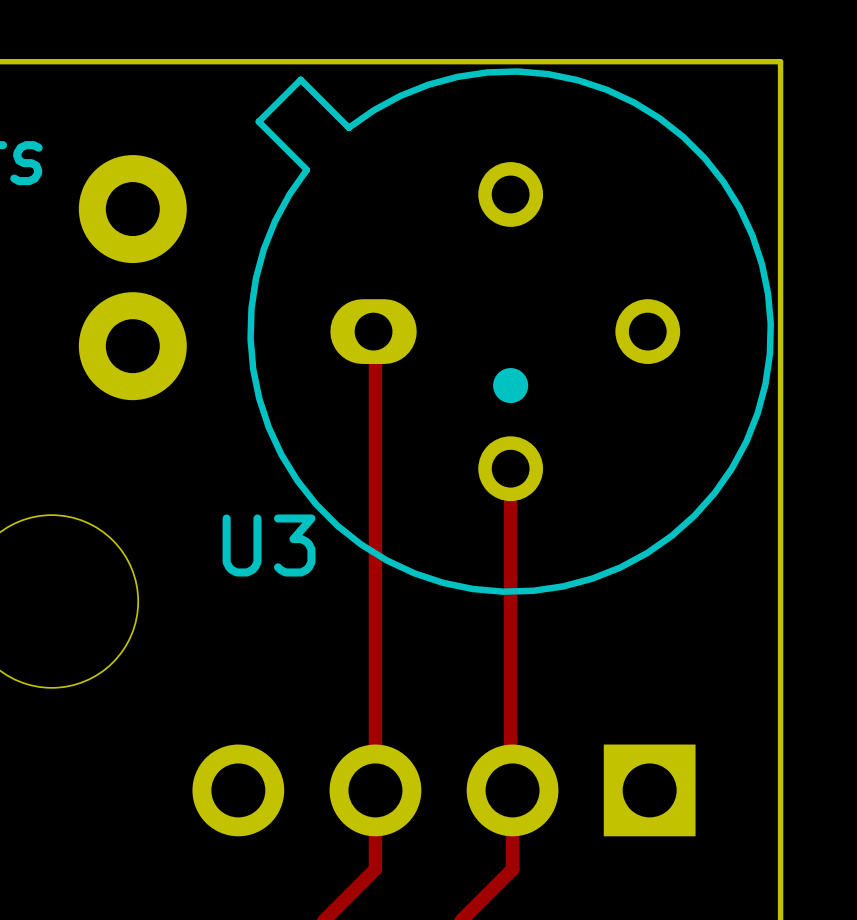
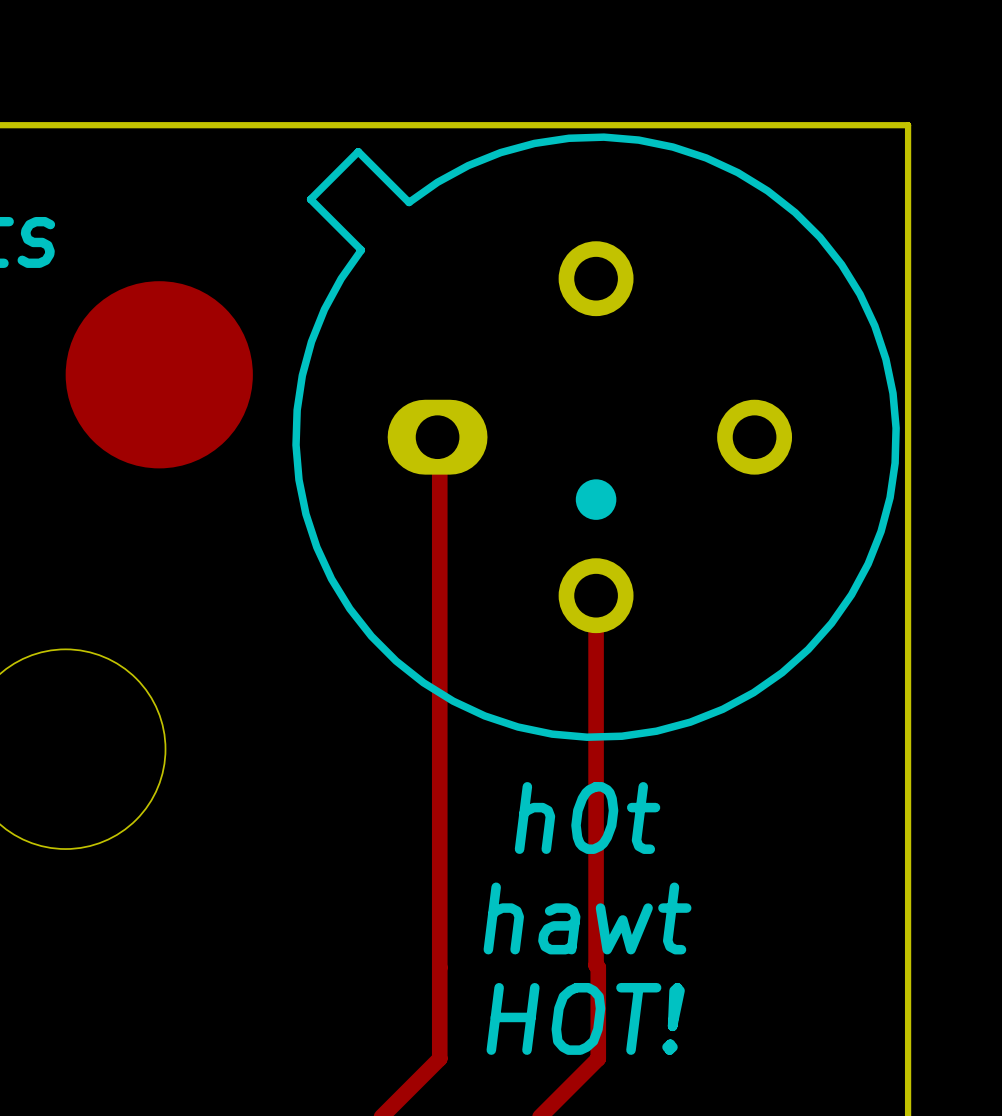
part footprint: [78, 155, 187, 401] -> [65, 281, 253, 469]
U3: (510, 331) -> none
part: none -> (596, 437)
text: none -> h0t (587, 818)
text: none -> hawt (587, 918)
part: (443, 790) -> none
text: none -> HOT! (585, 1018)

